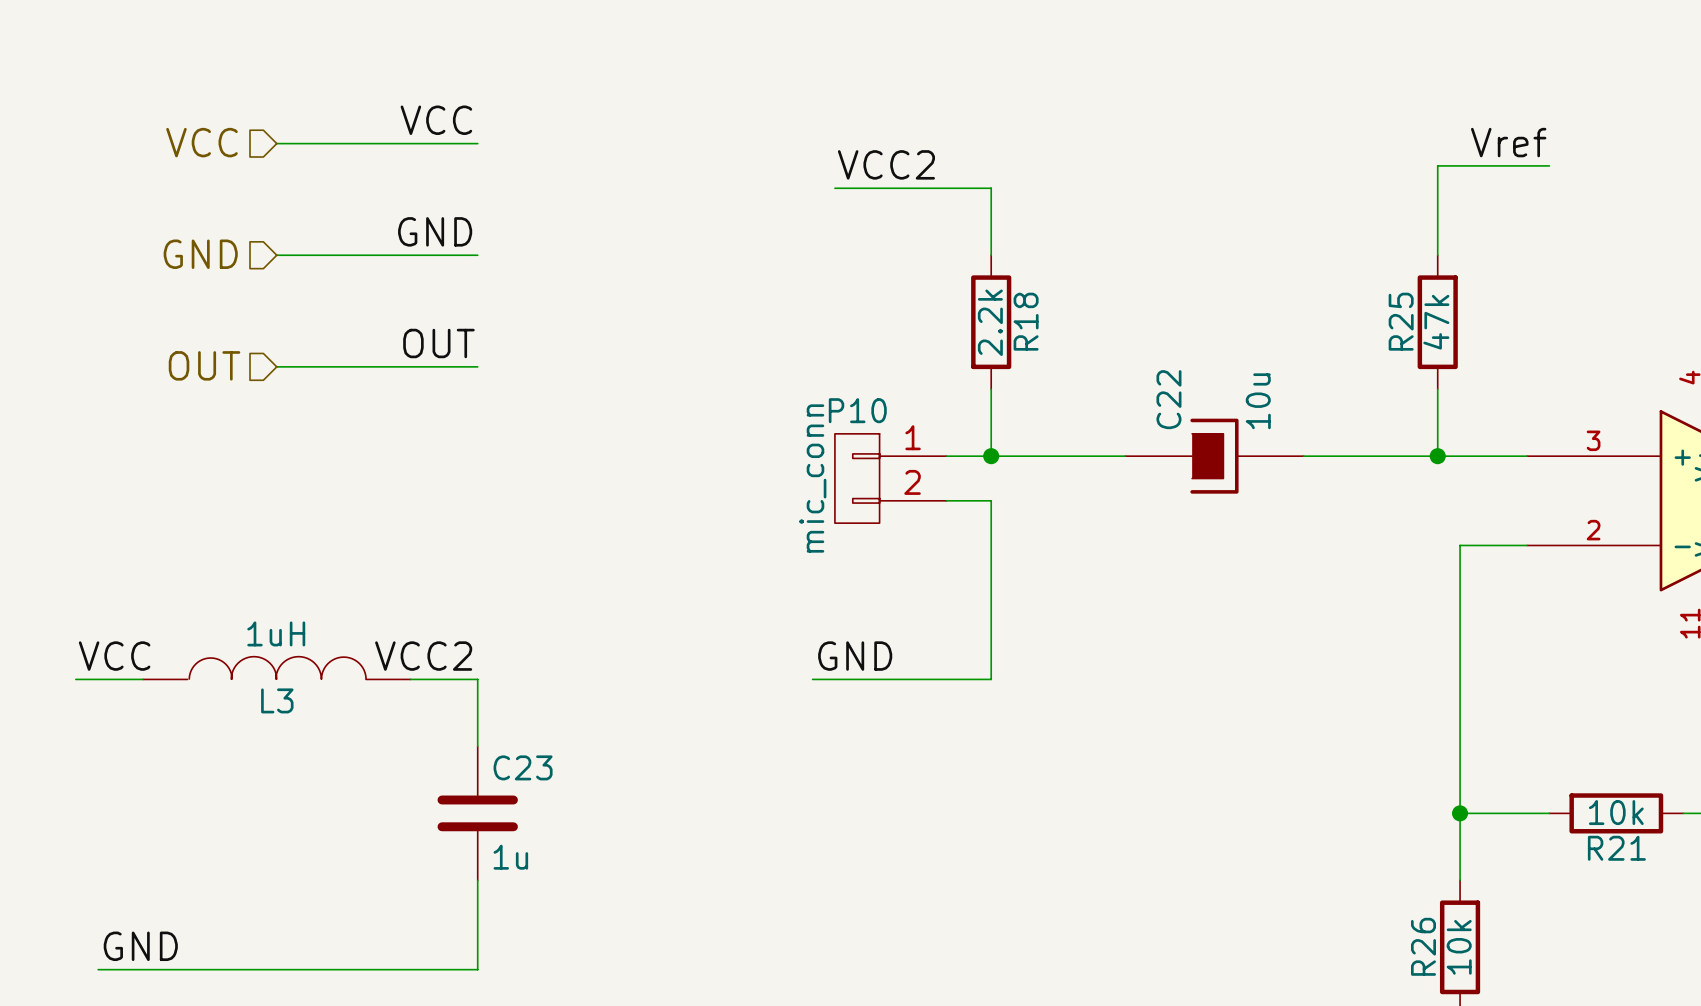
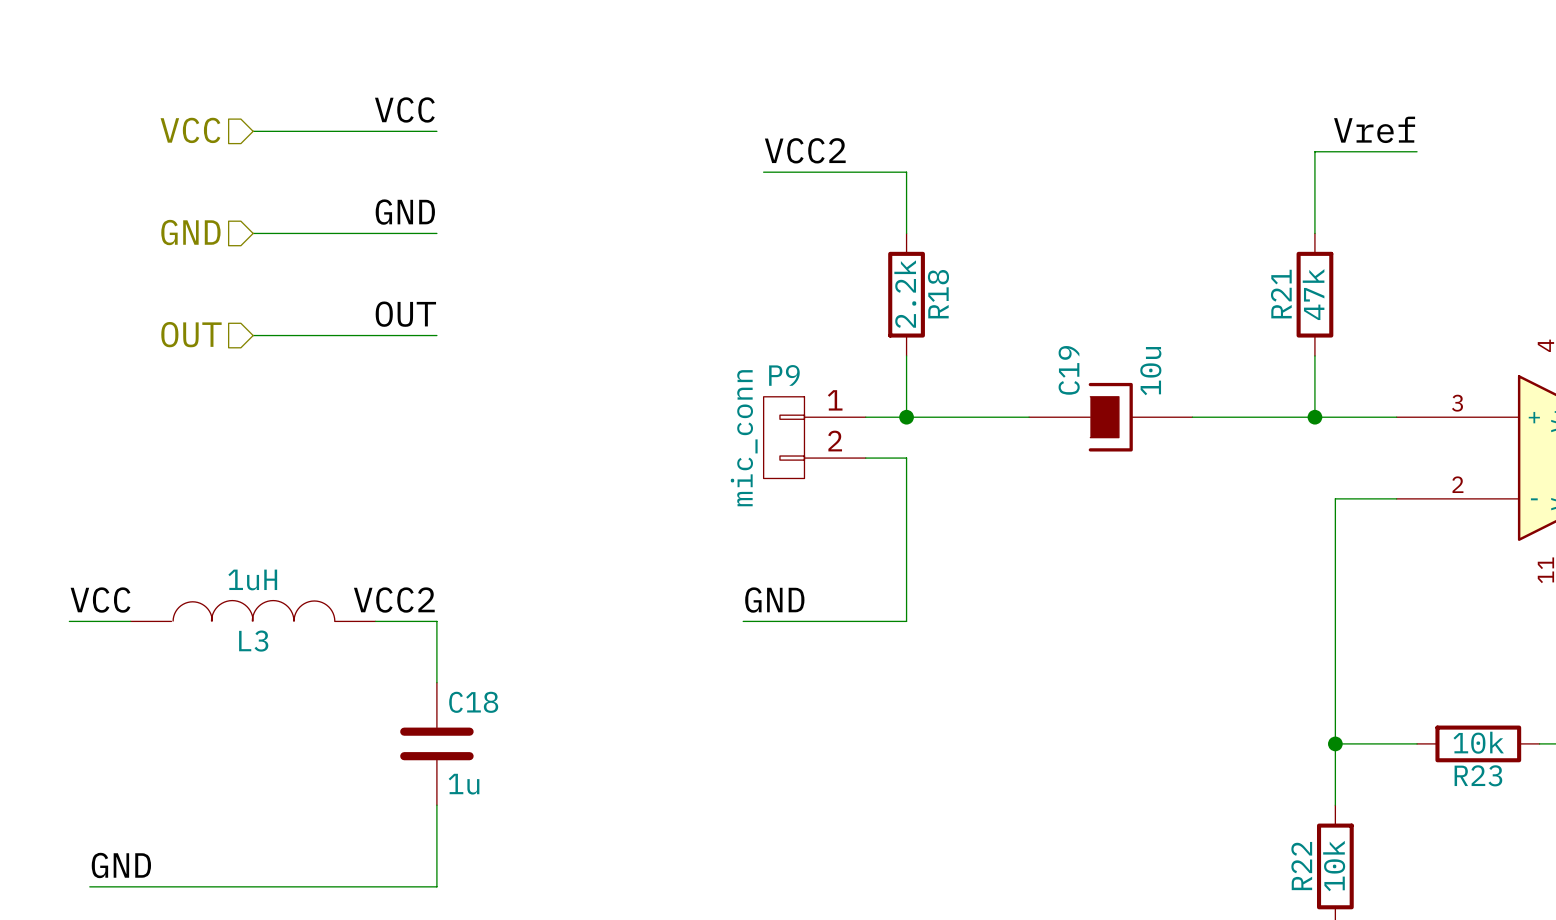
R25 name: R25 (1401, 321) -> R21 (1281, 294)
C22 name: C22 (1168, 399) -> C19 (1069, 370)
P10 name: P10 (857, 410) -> P9 (784, 375)
C23 name: C23 (523, 767) -> C18 (473, 702)
R21 name: R21 (1616, 848) -> R23 (1478, 775)
R26 name: R26 (1423, 946) -> R22 (1301, 866)

